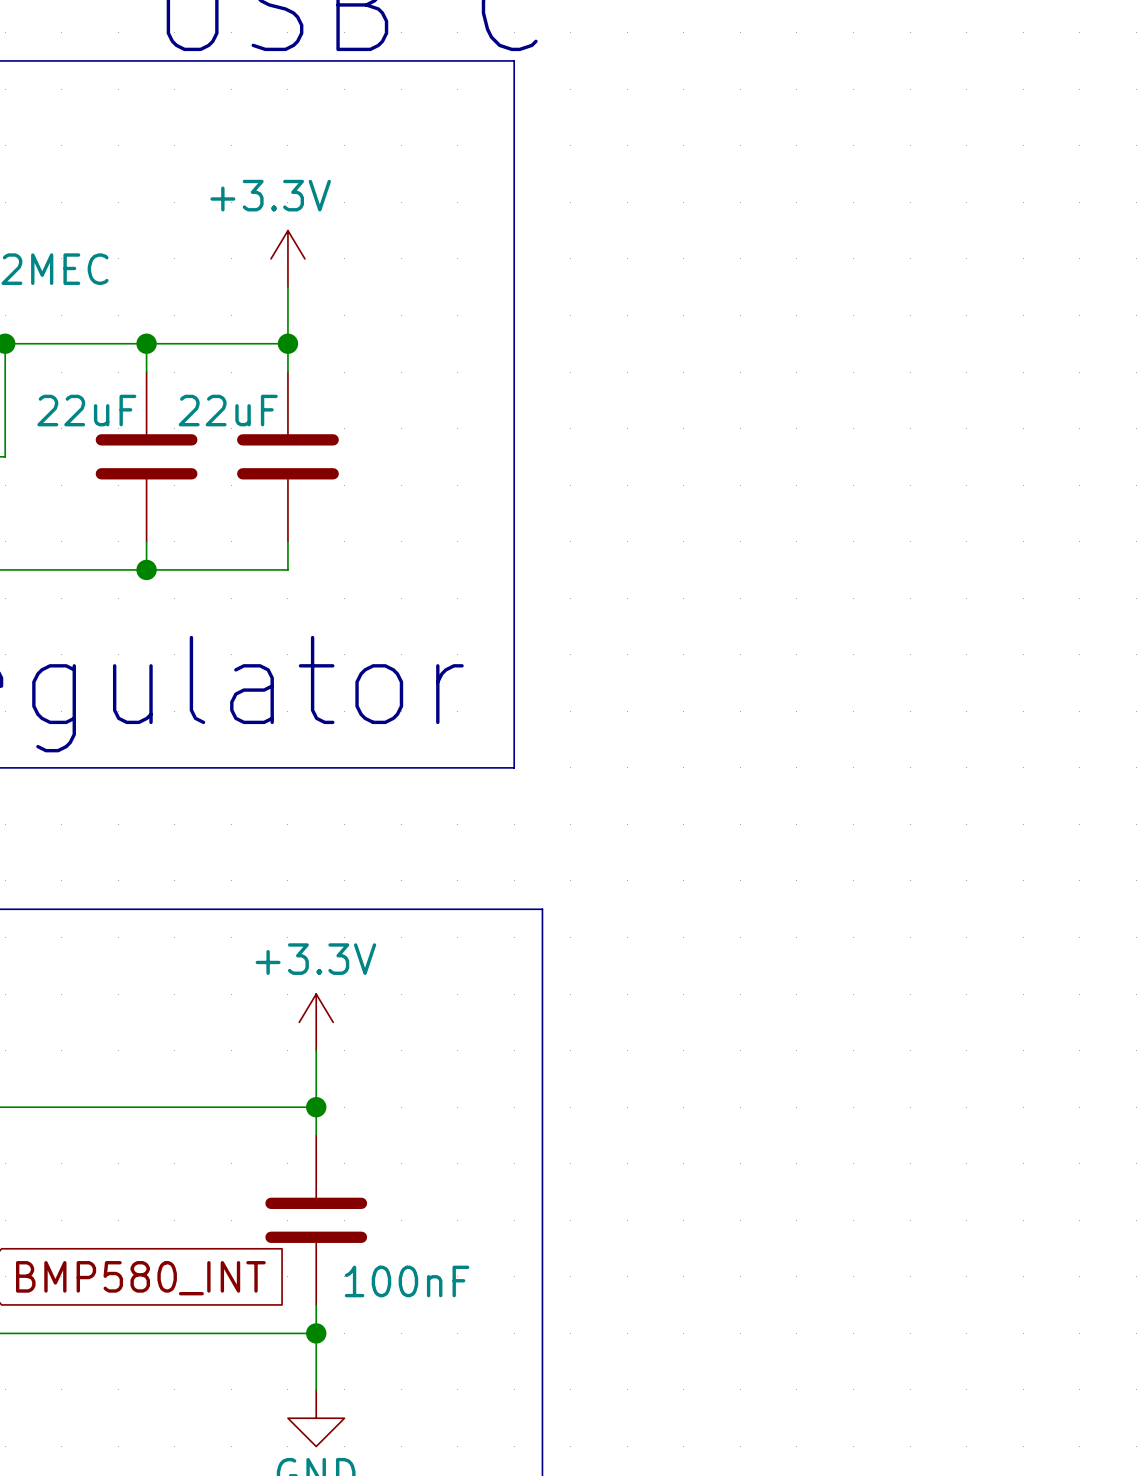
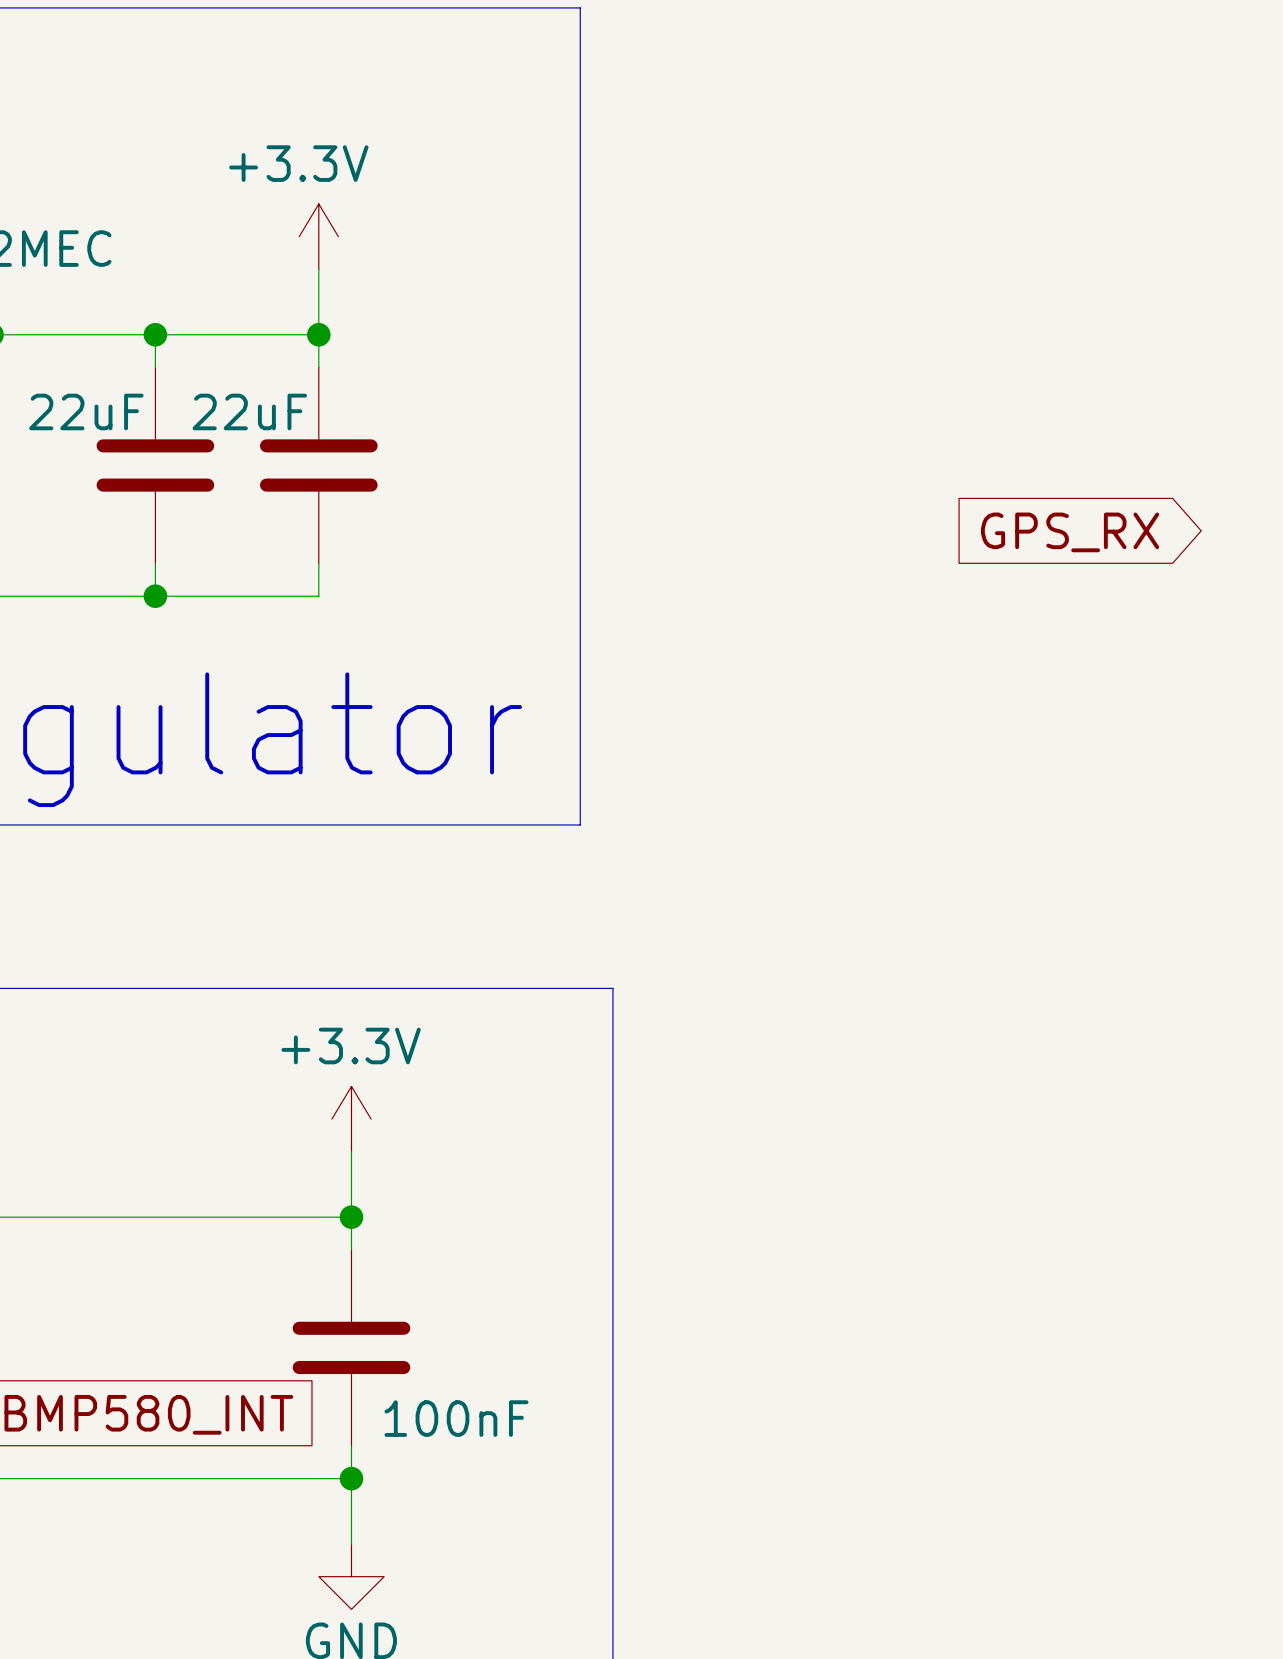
global label: none -> GPS_RX (1070, 532)

